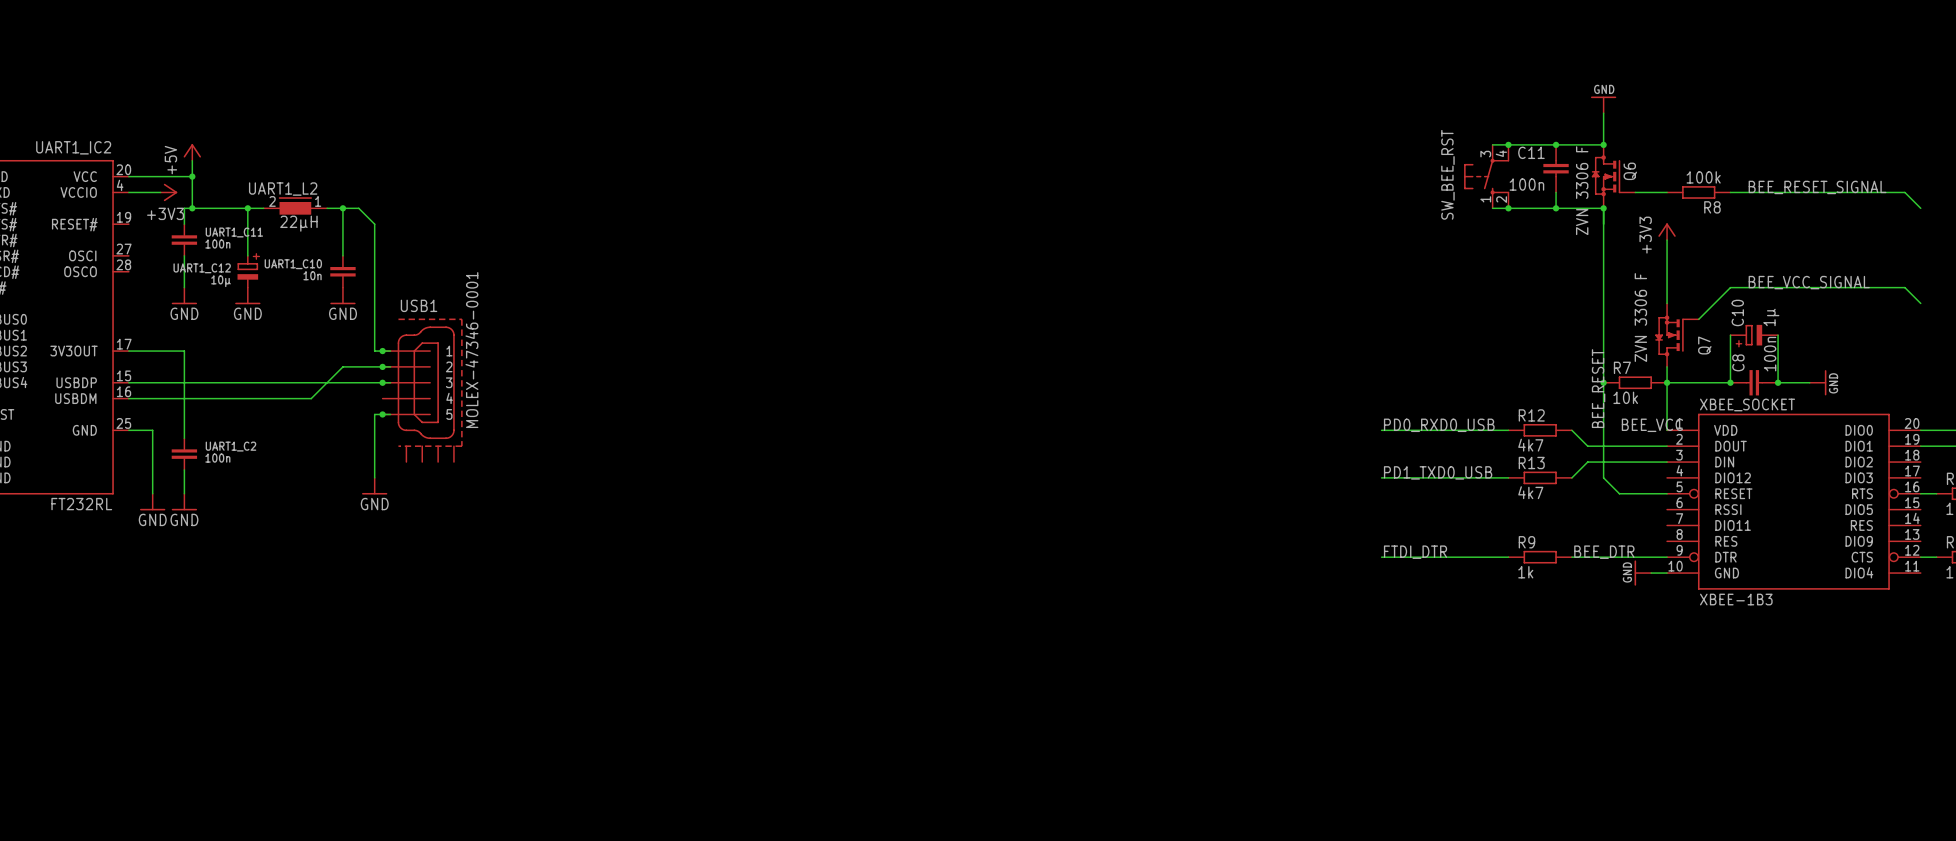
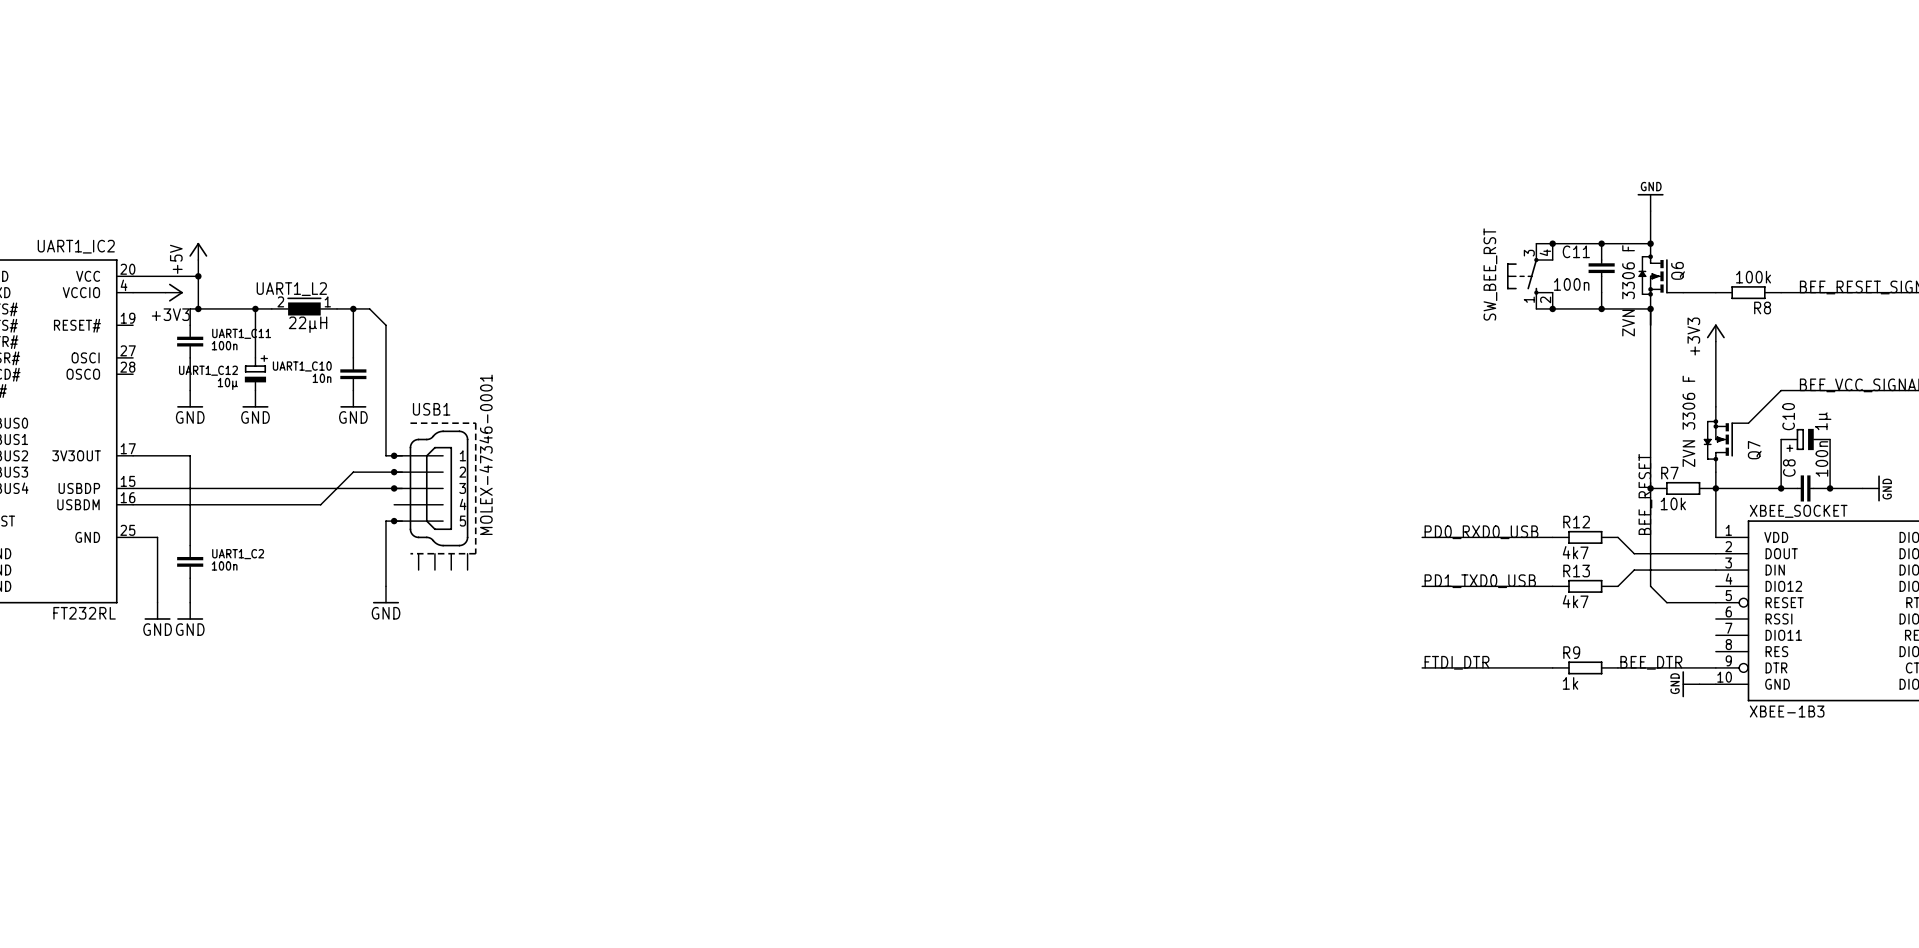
label: BEE_VCC (1652, 425) -> none

